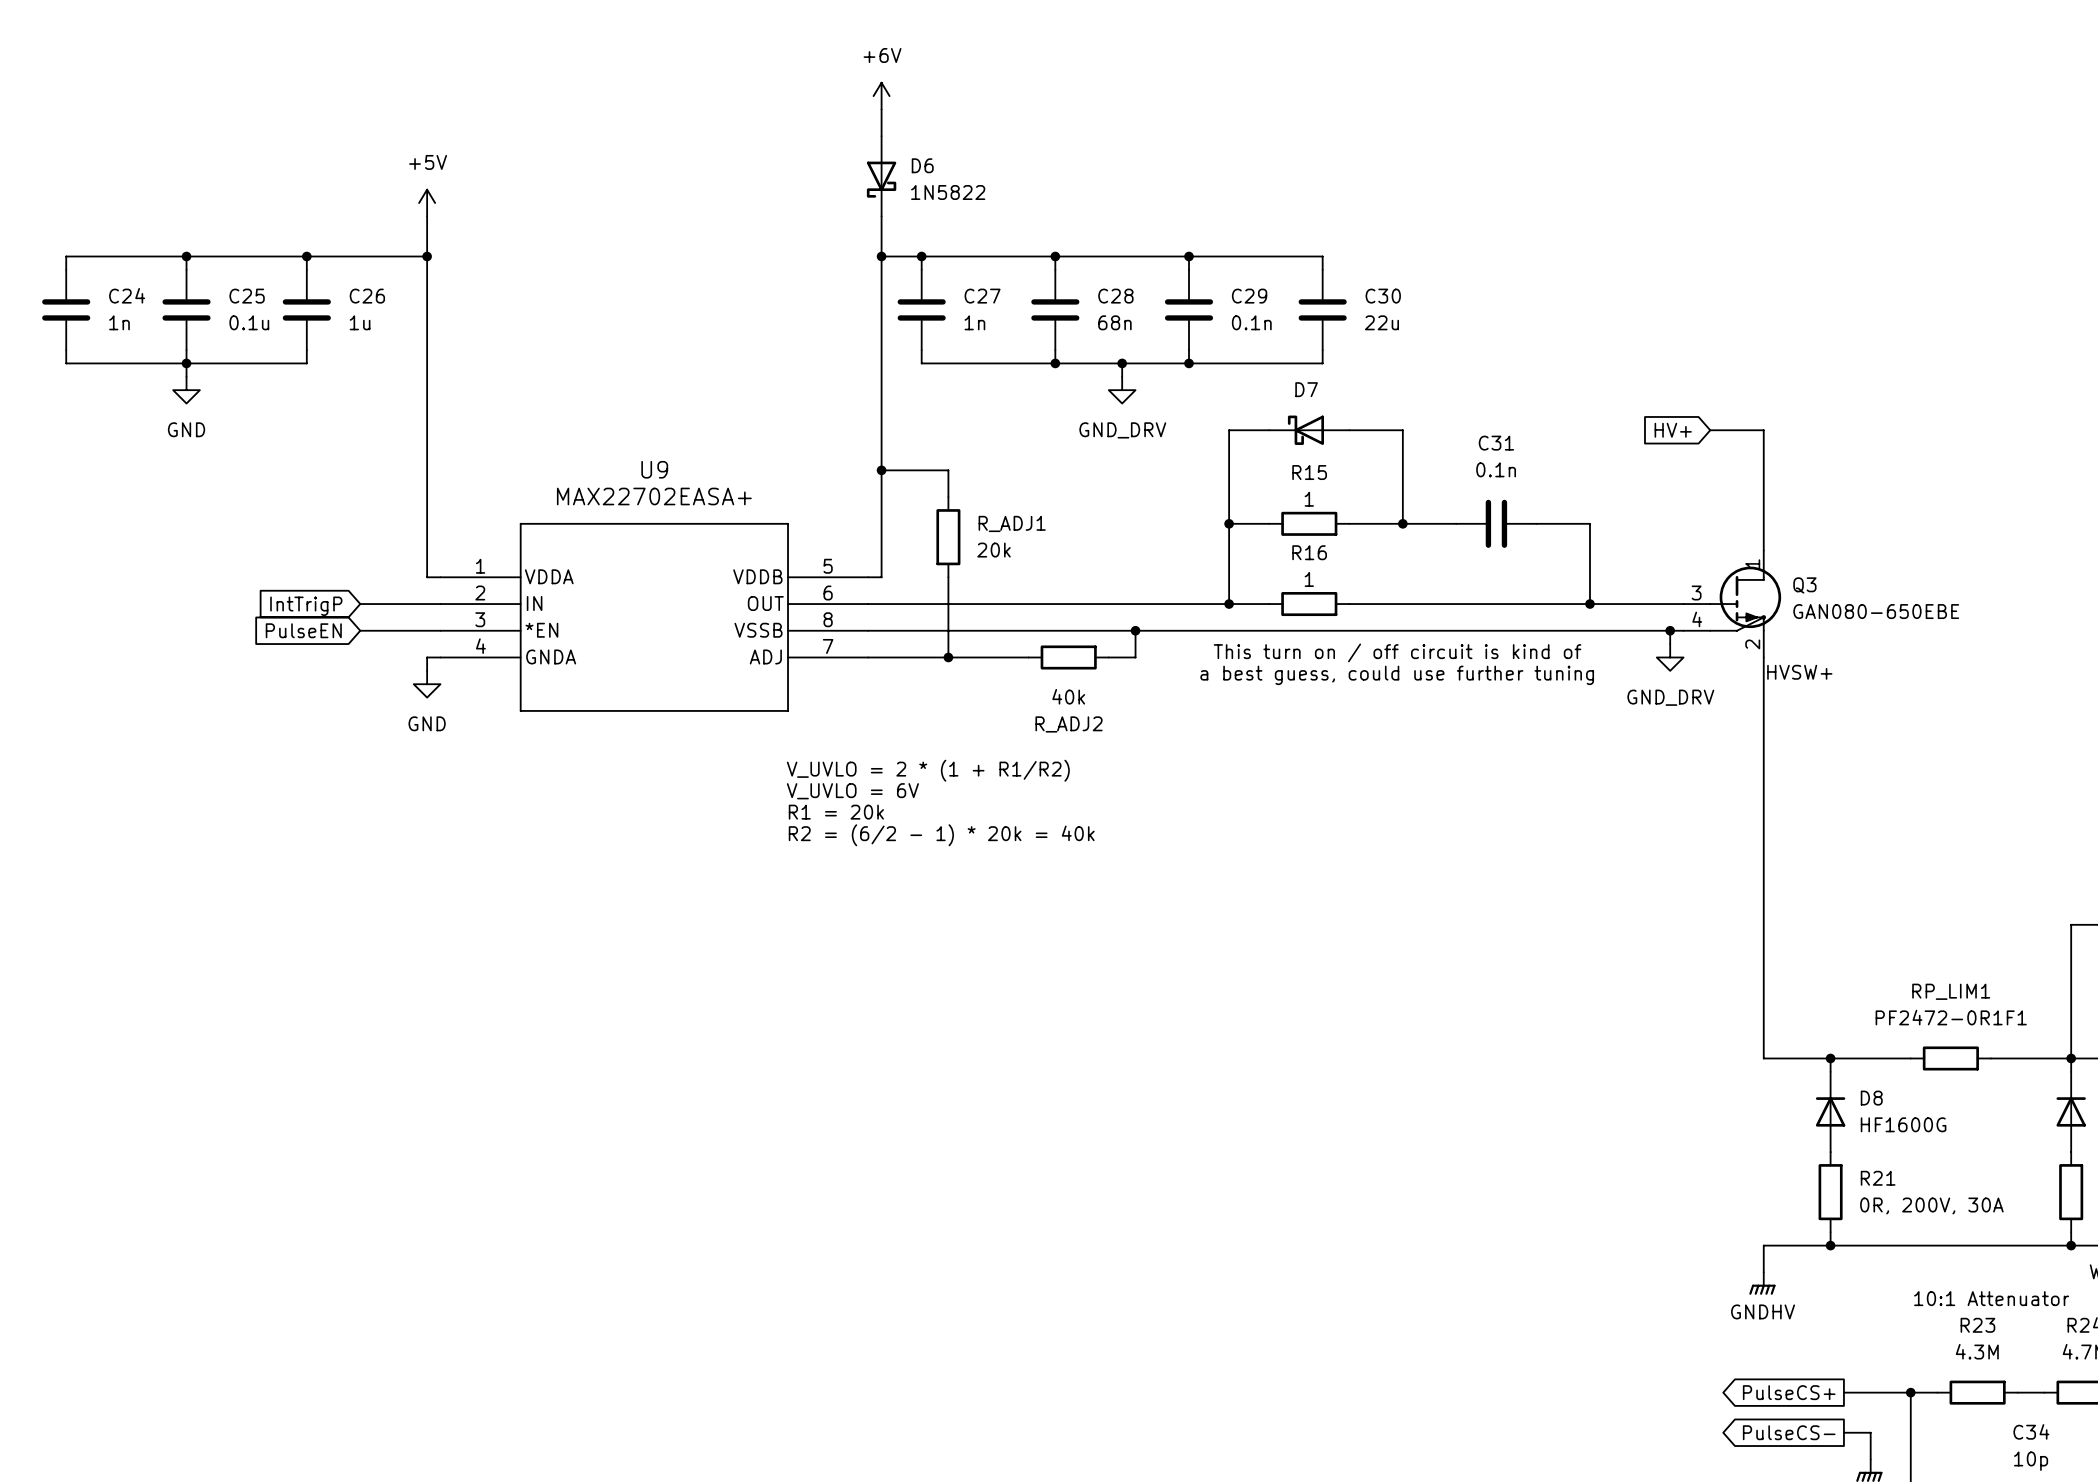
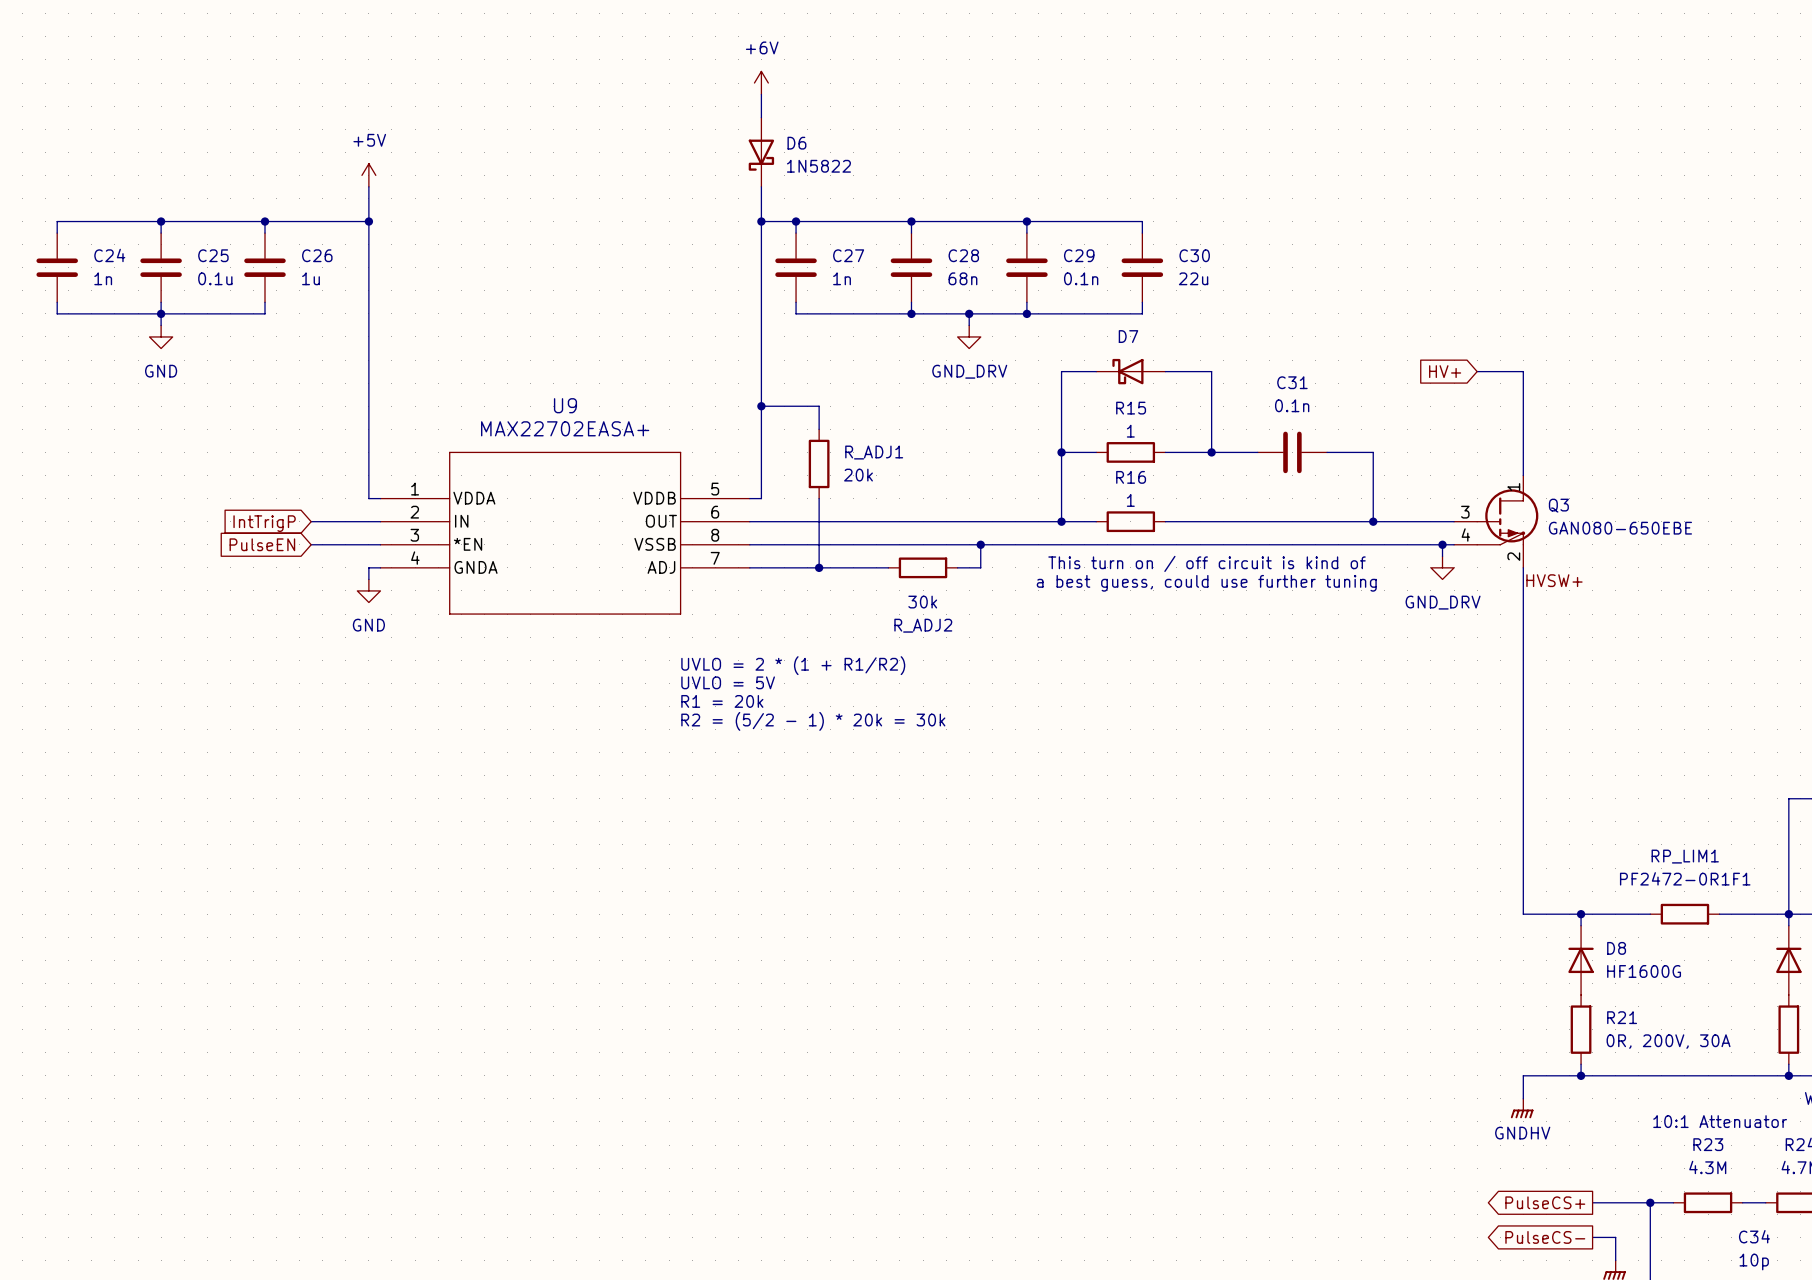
R_ADJ2 value: 40k (1068, 696) -> 30k (922, 602)
text: V_UVLO = 2 * (1 + R1/R2) (928, 770) -> UVLO = 2 * (1 + R1/R2) (793, 665)
text: V_UVLO = 6V (852, 791) -> UVLO = 5V (728, 682)
text: R2 = (6/2 - 1) * 20k = 40k (941, 835) -> R2 = (5/2 - 1) * 20k = 30k (813, 721)

